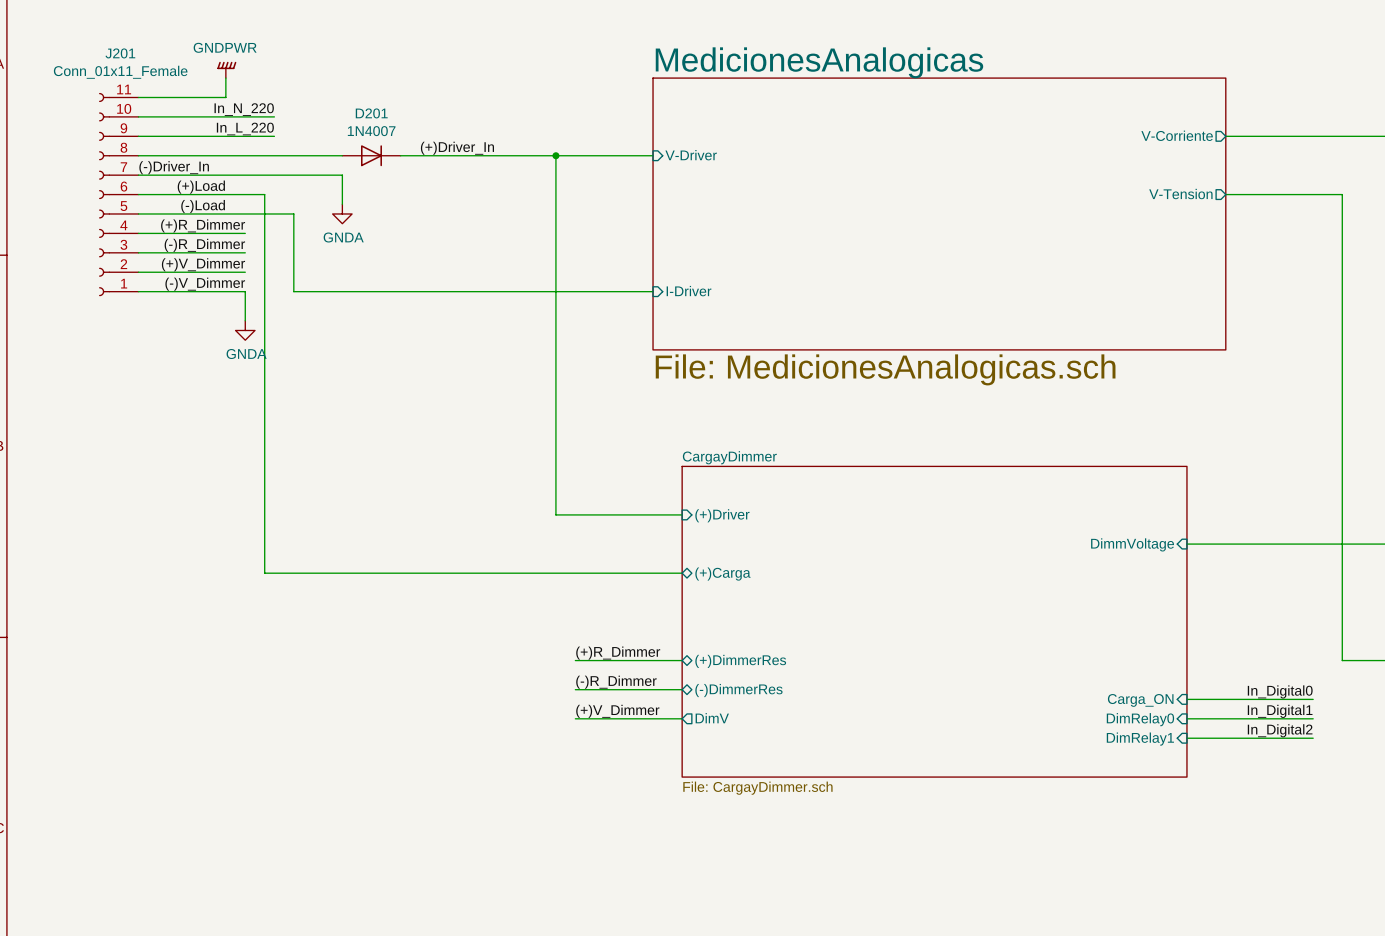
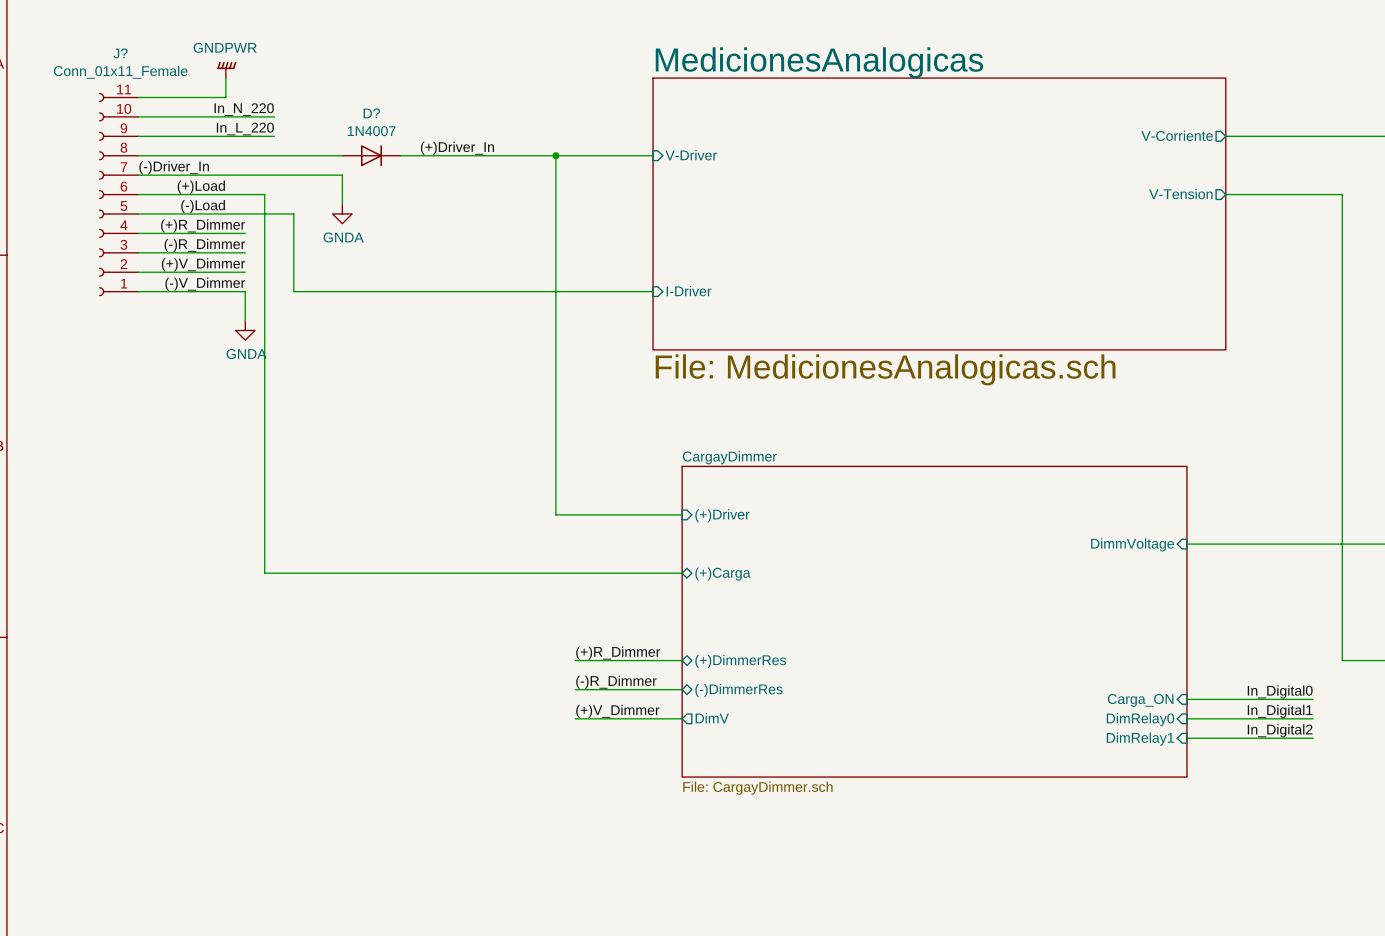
J201 name: J201 (120, 53) -> J? (120, 53)
D201 name: D201 (371, 113) -> D? (371, 113)

